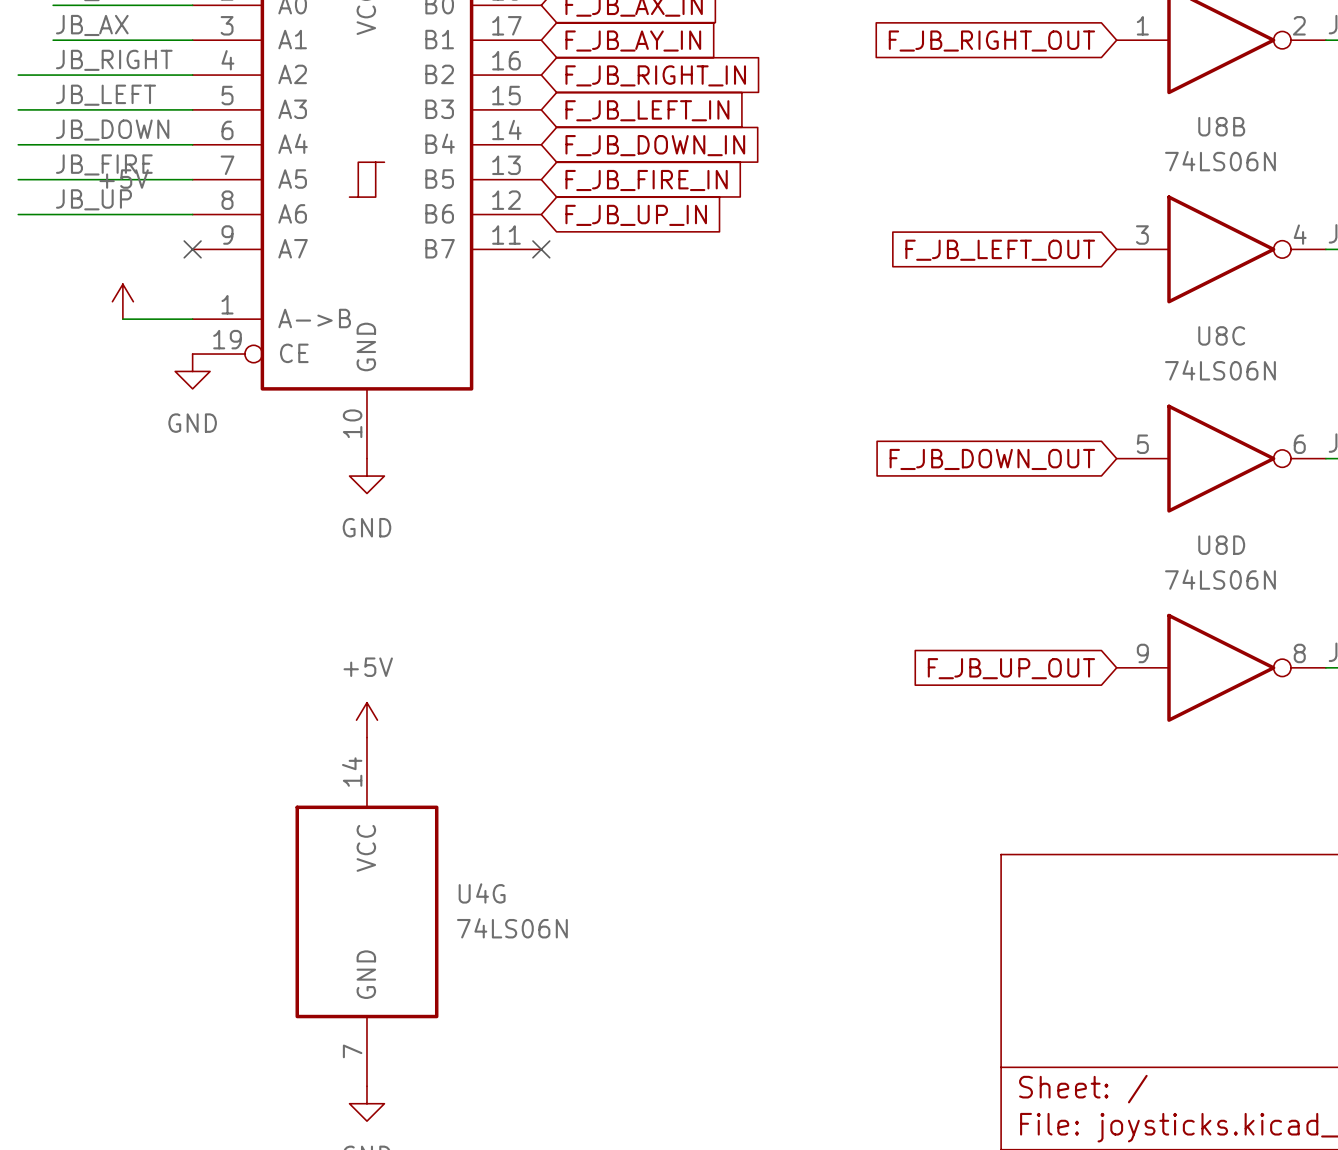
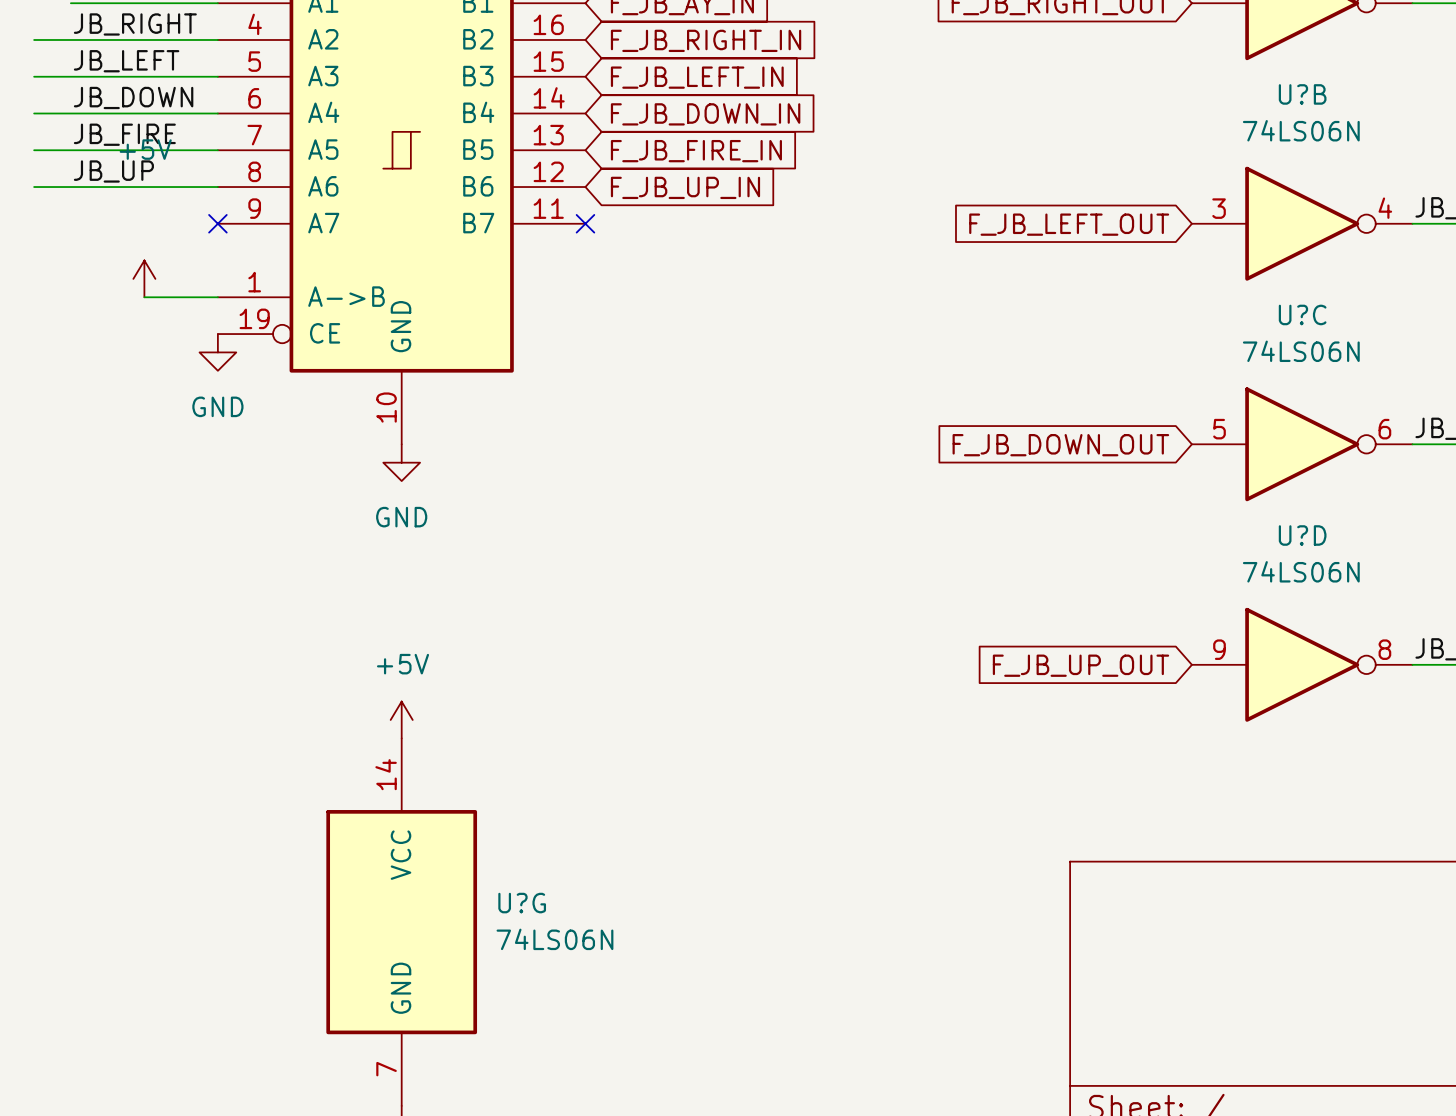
U8B name: U8B (1221, 126) -> U?B (1302, 94)
U8C name: U8C (1221, 335) -> U?C (1302, 314)
U8D name: U8D (1221, 545) -> U?D (1302, 535)
U4G name: U4G (482, 893) -> U?G (522, 903)

